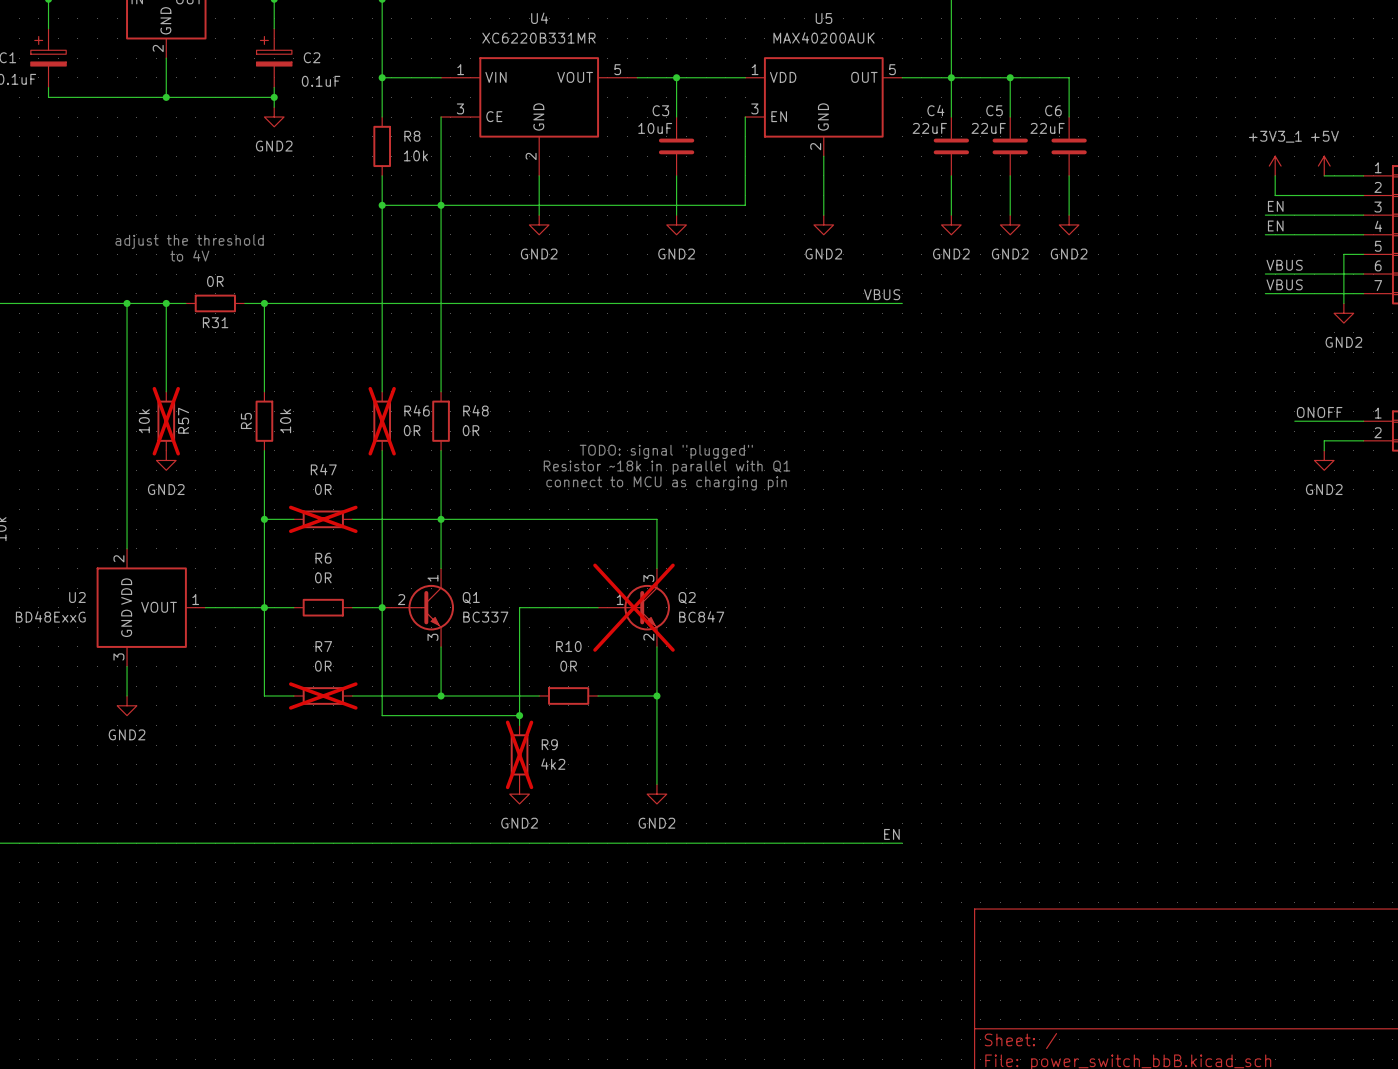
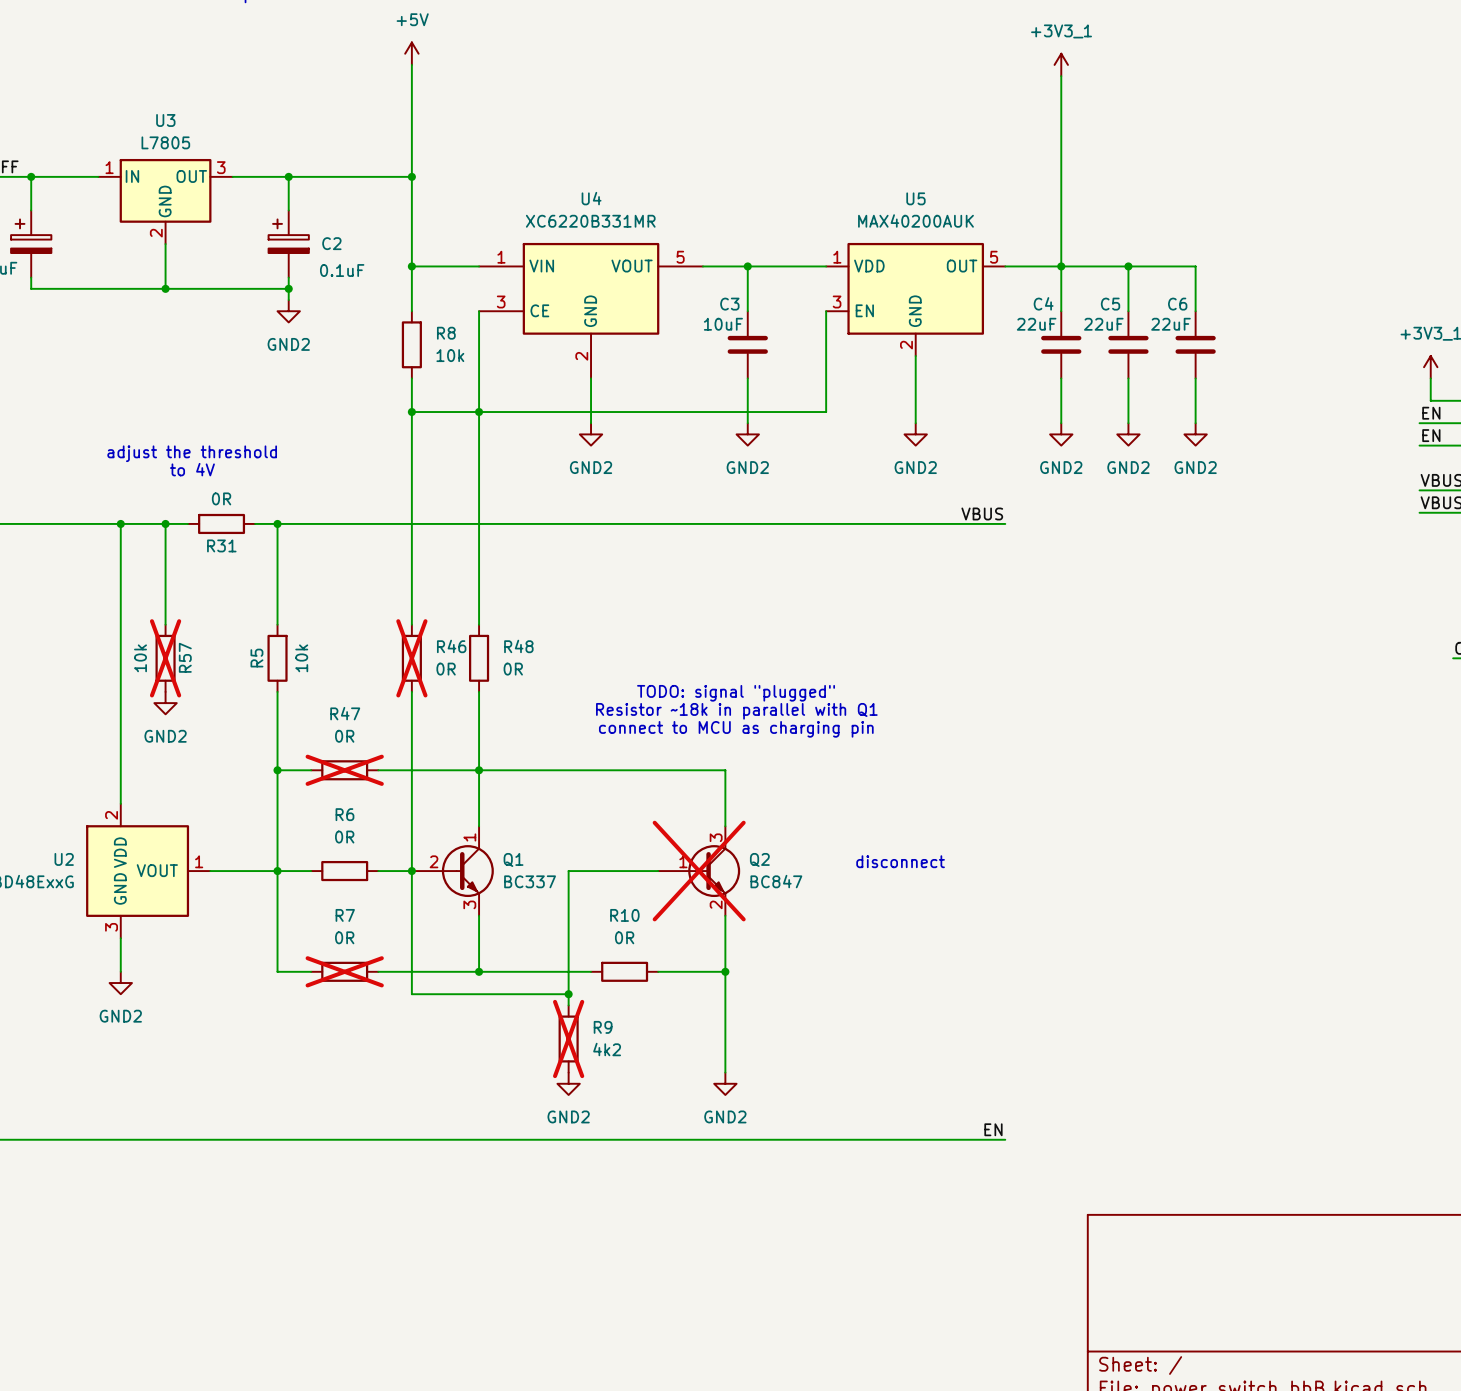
text: none -> disconnect (900, 861)

